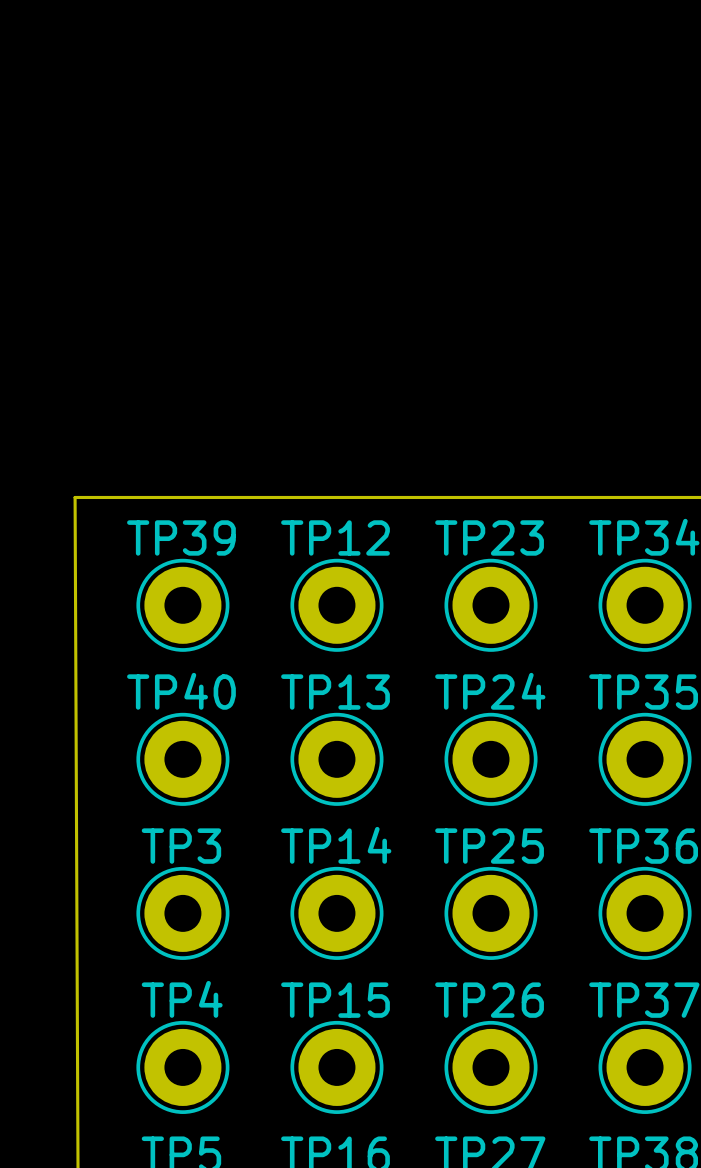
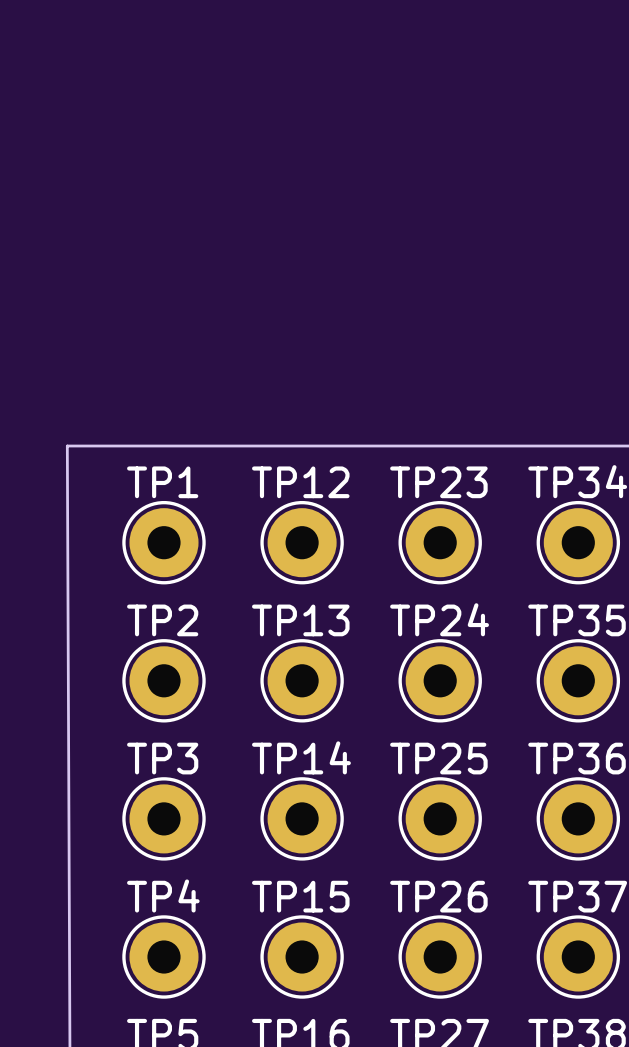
TP39 name: TP39 (181, 537) -> TP1 (162, 482)
TP40 name: TP40 (181, 691) -> TP2 (162, 620)

